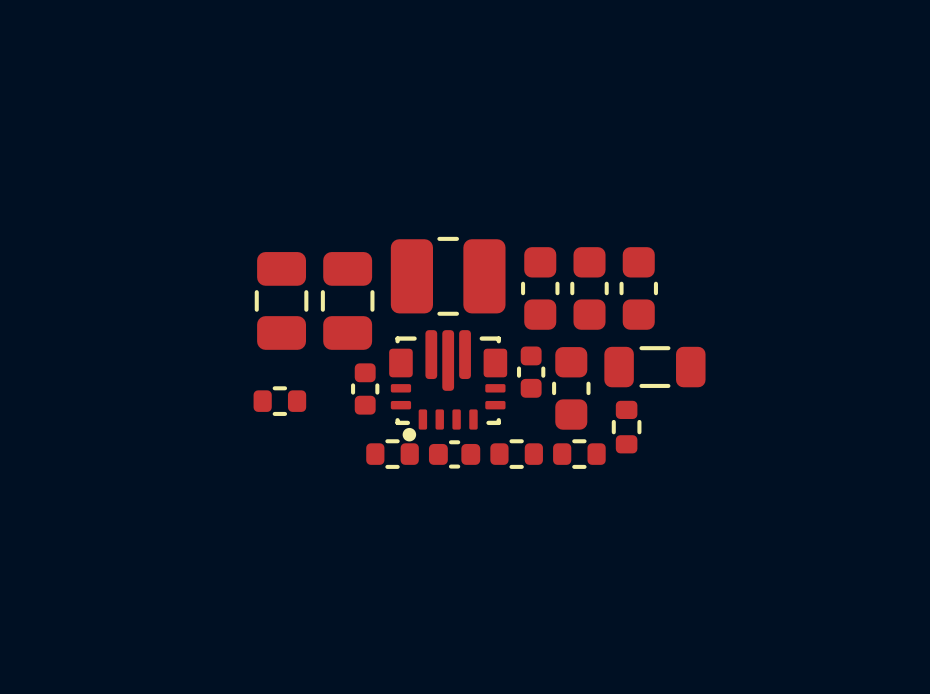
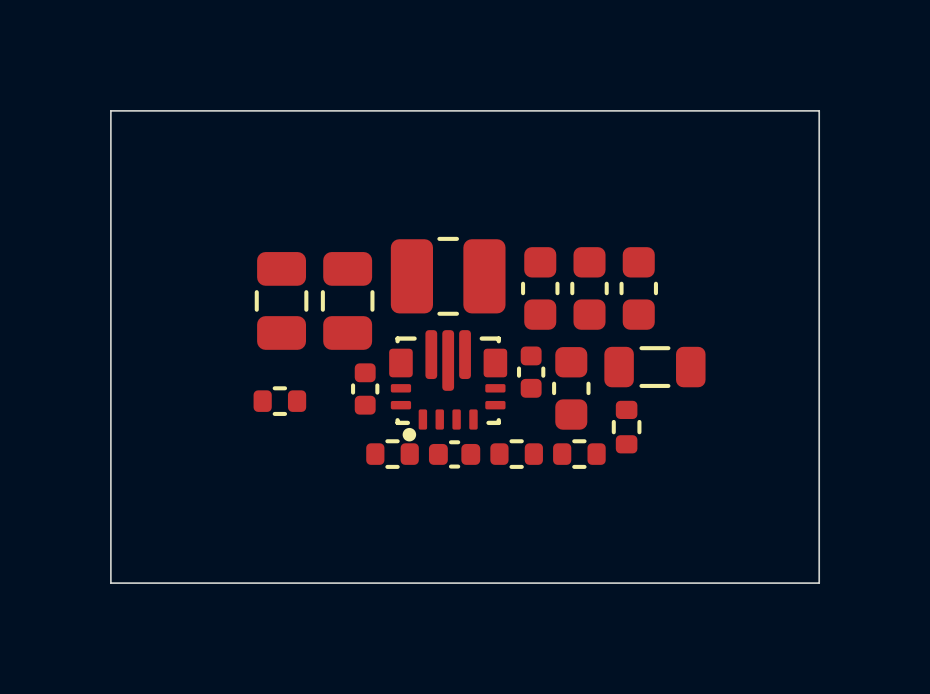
board edge: none -> (110, 110) (819, 110) (819, 583) (110, 583) (110, 110)

